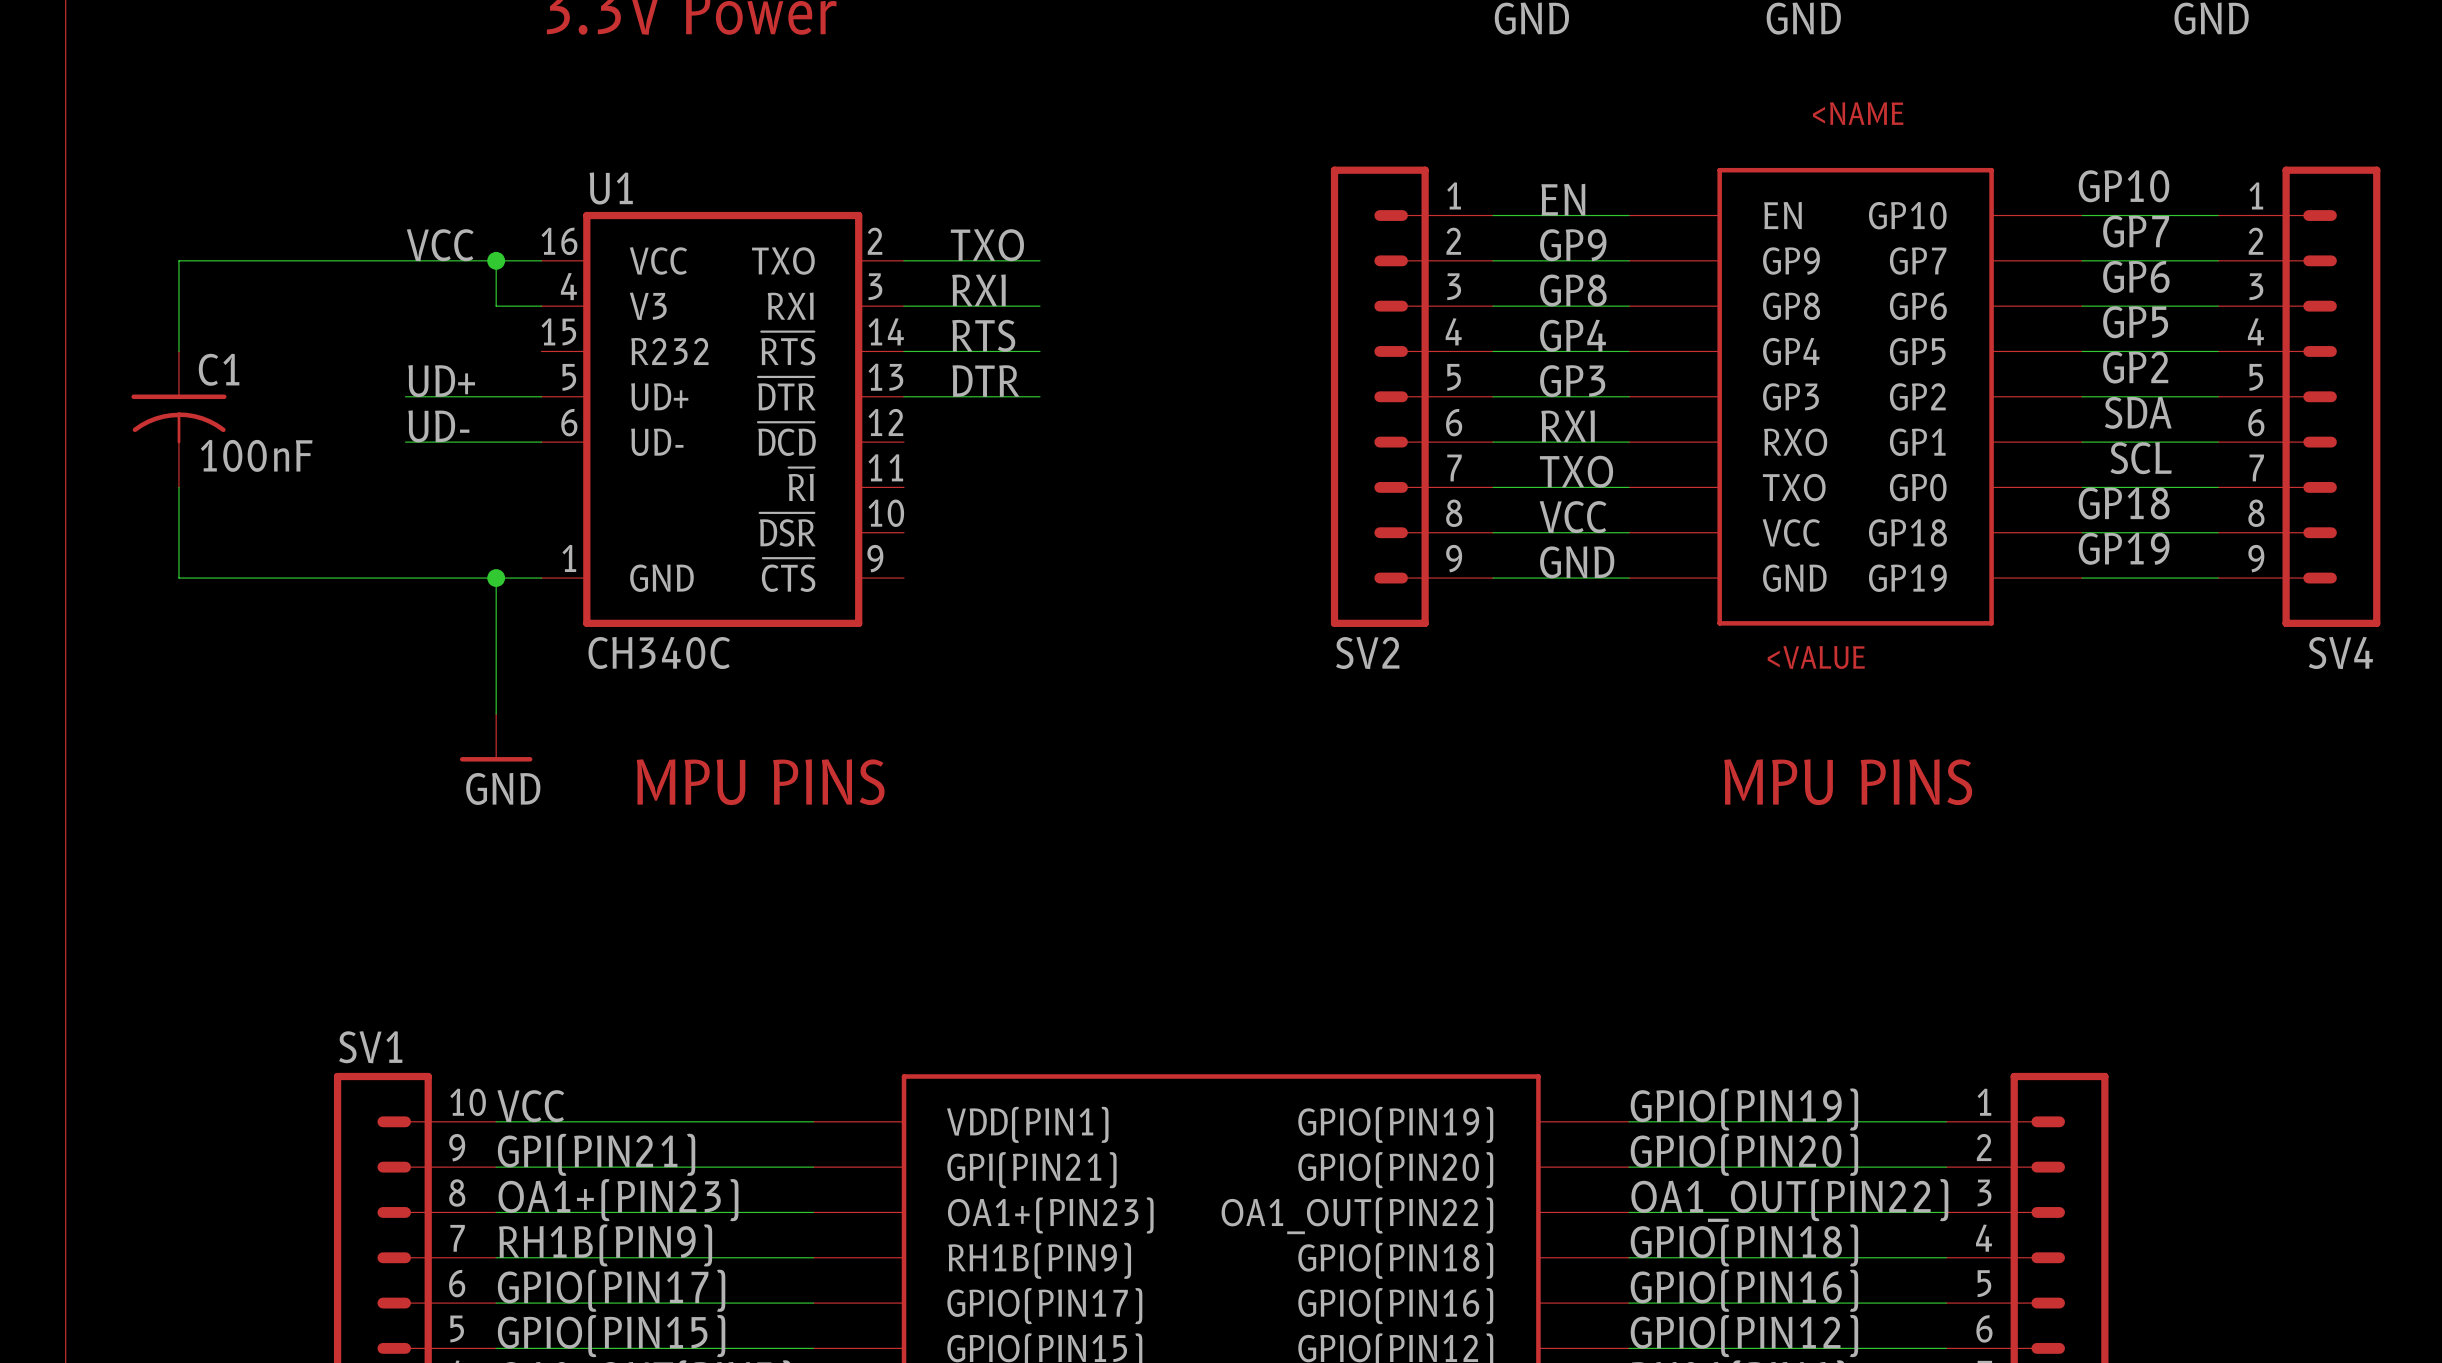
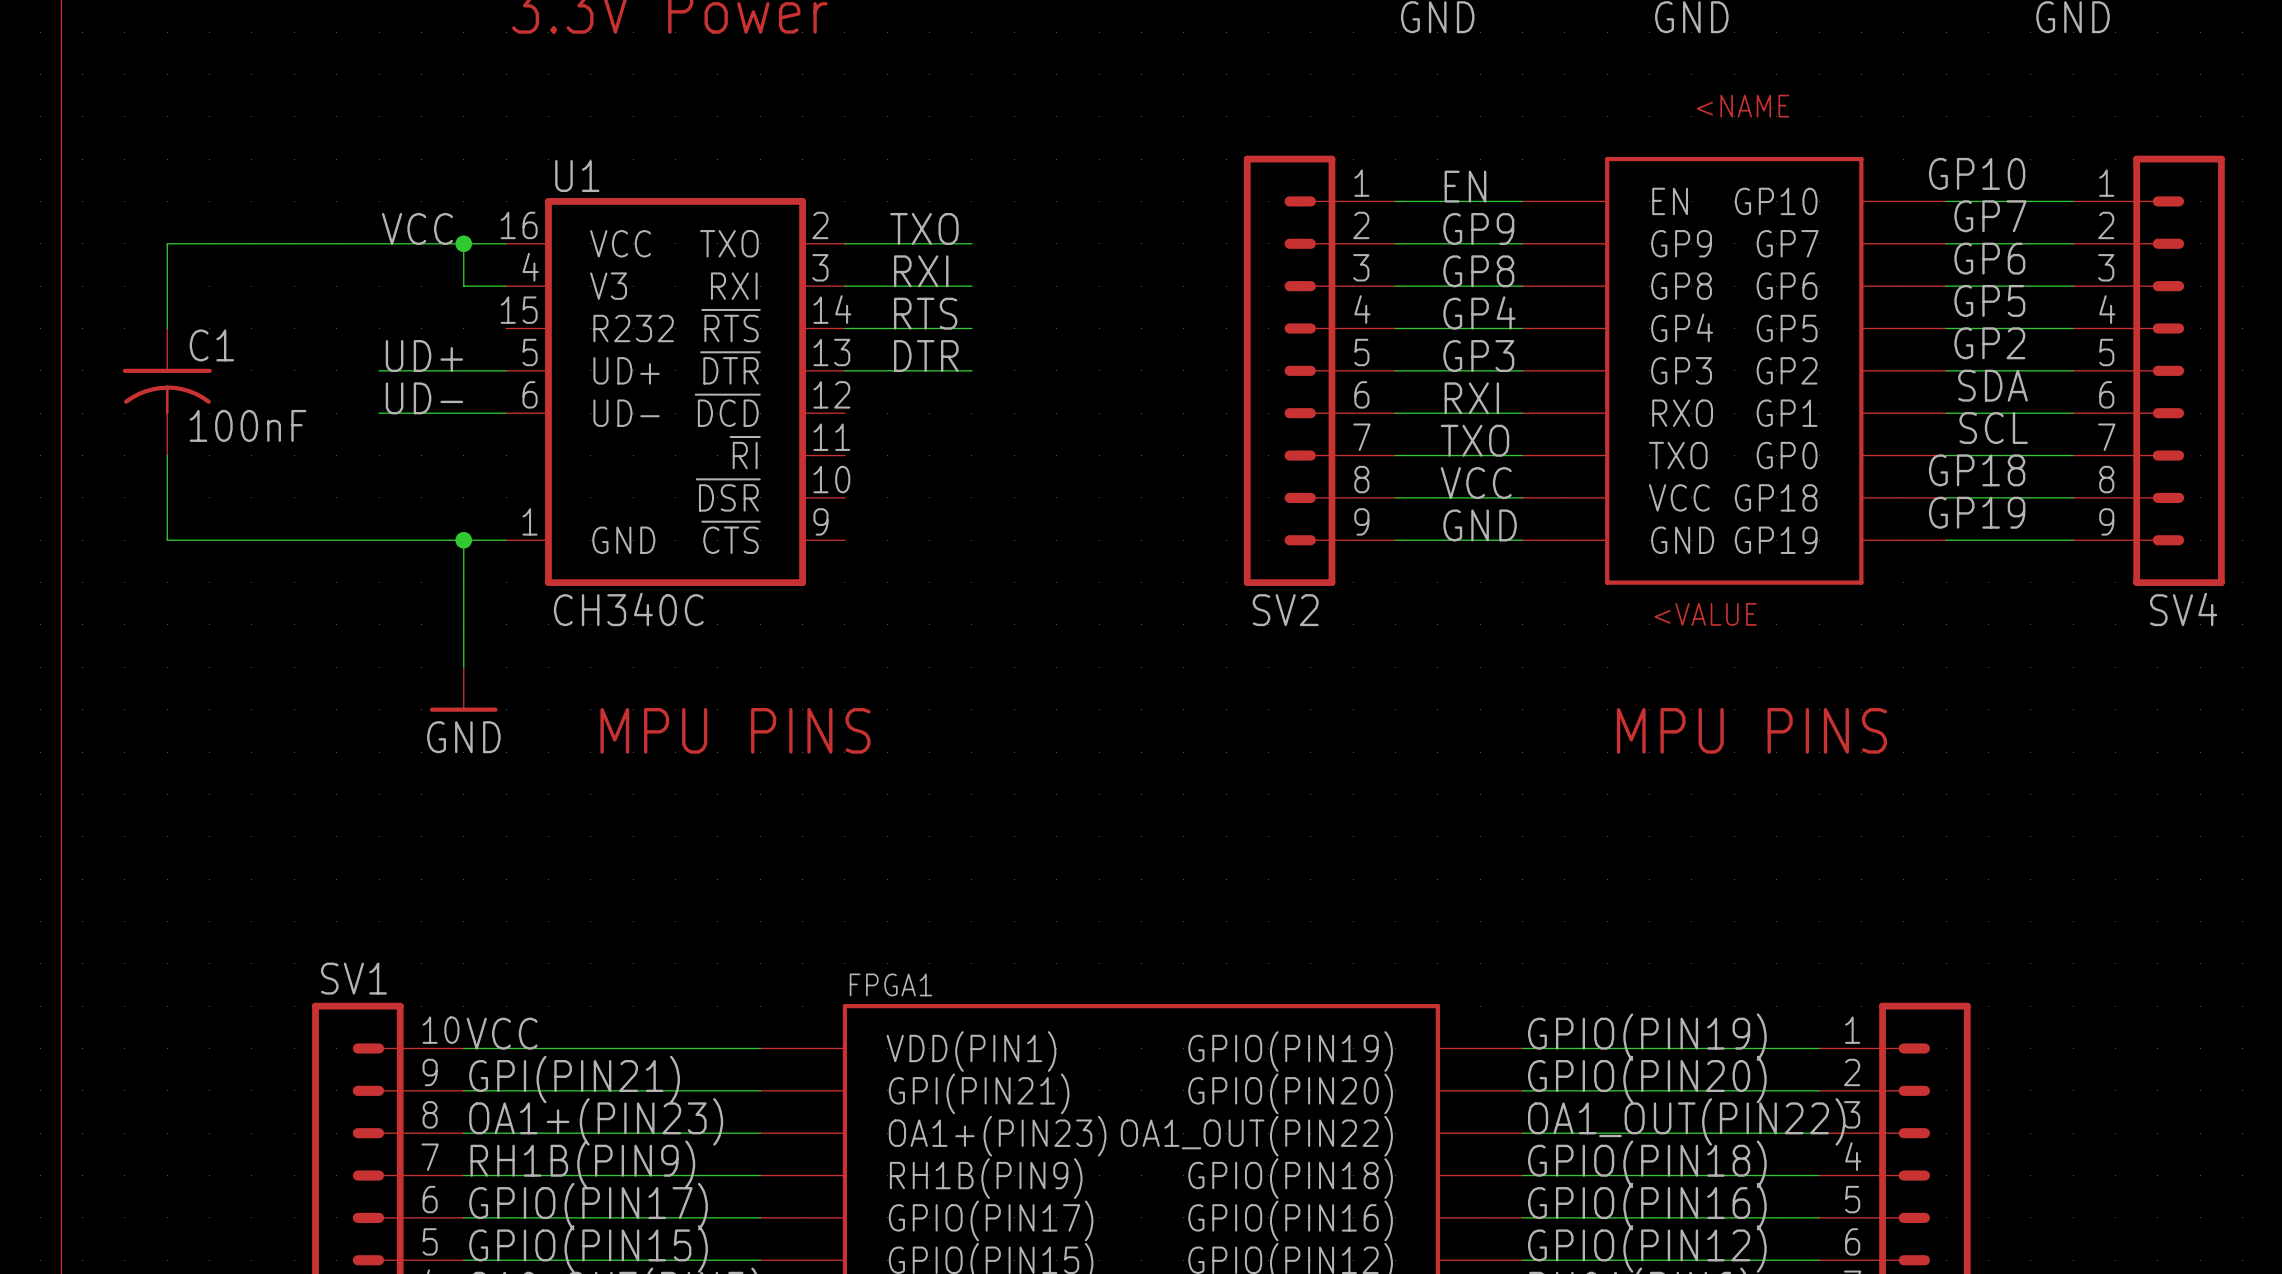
FPGA1 name: none -> FPGA1 (890, 984)

